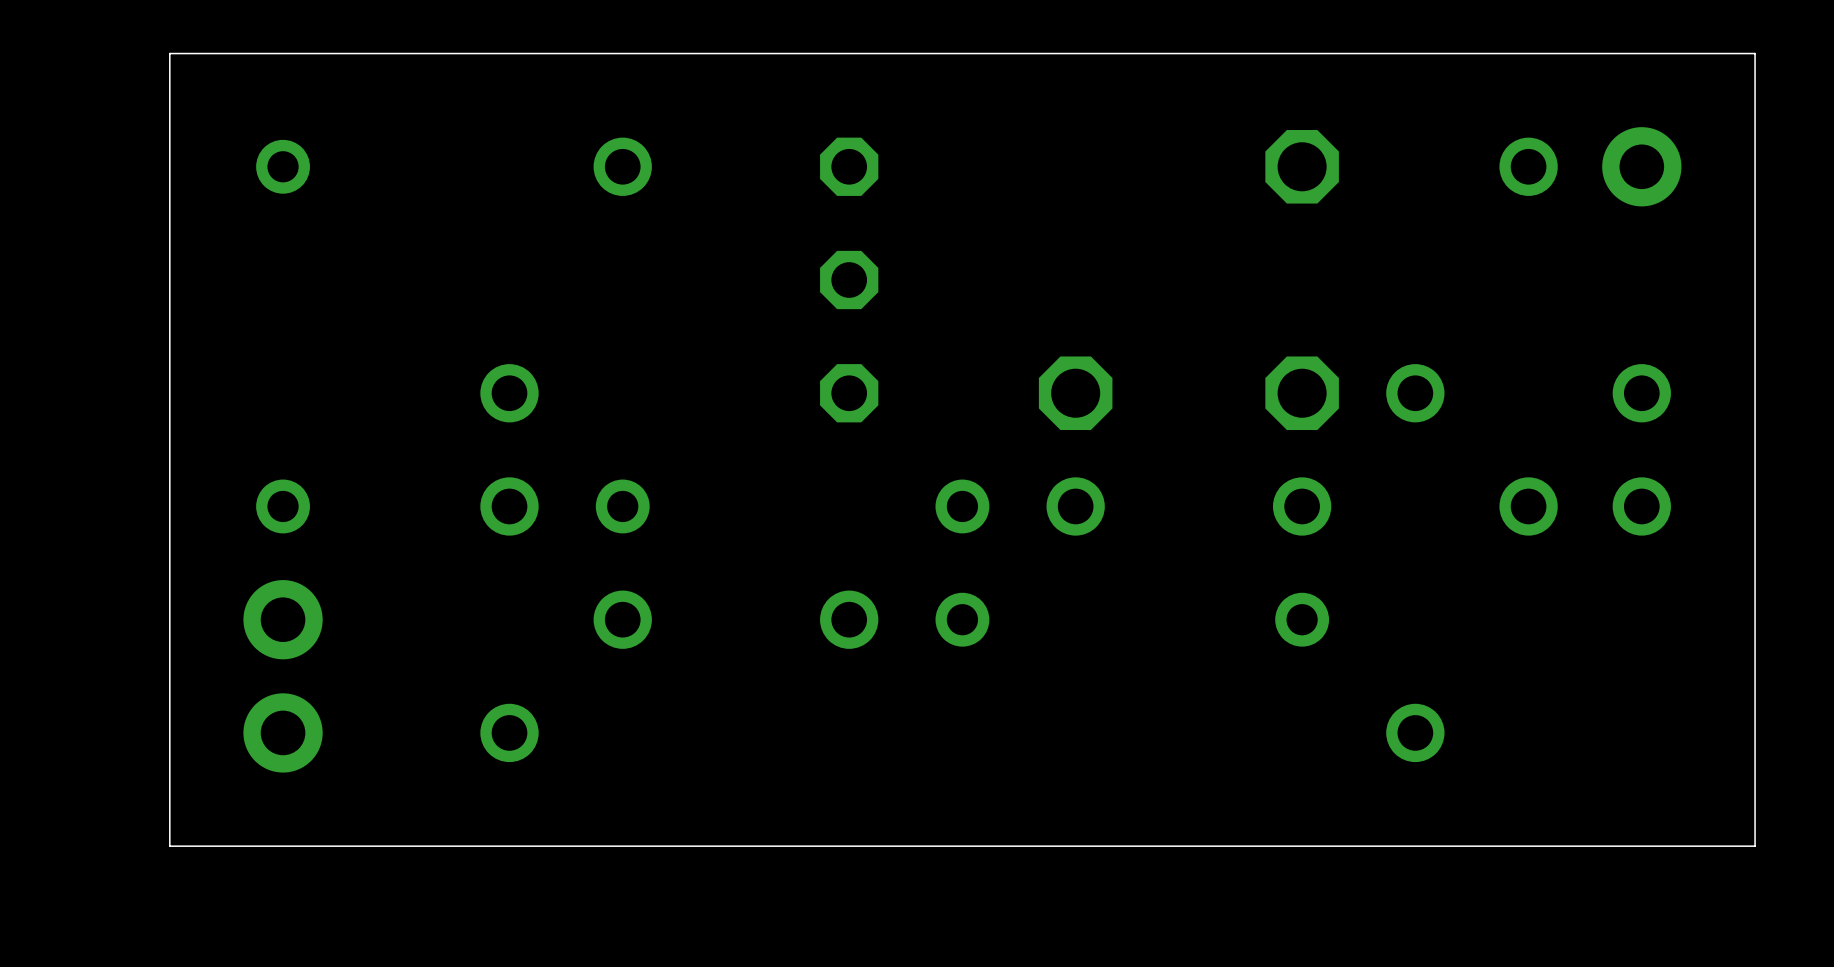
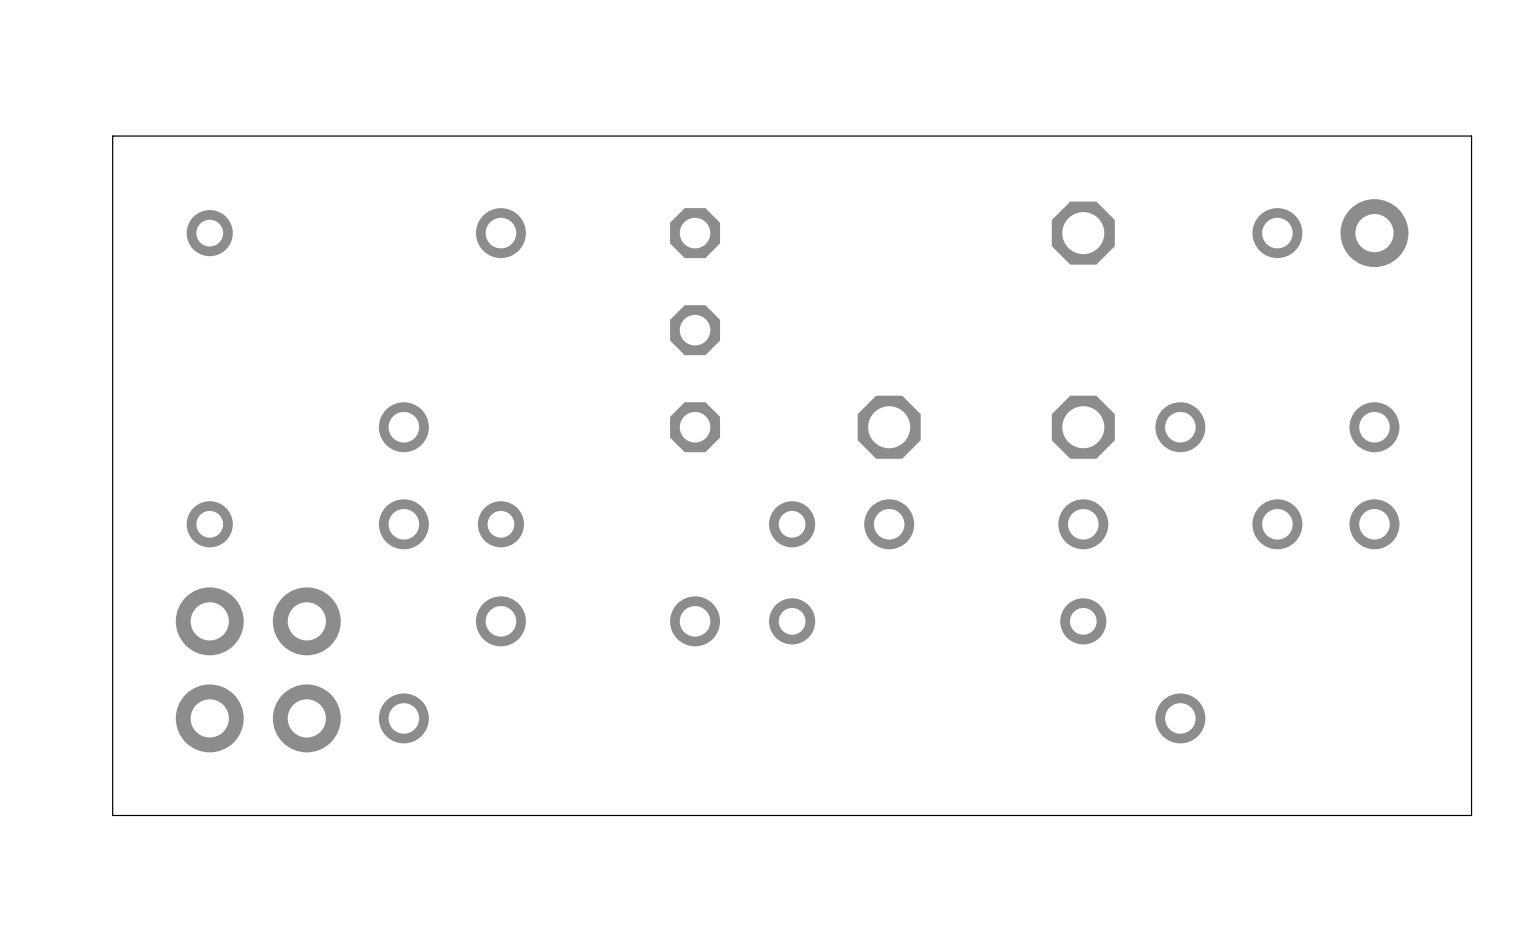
part: none -> (306, 669)

